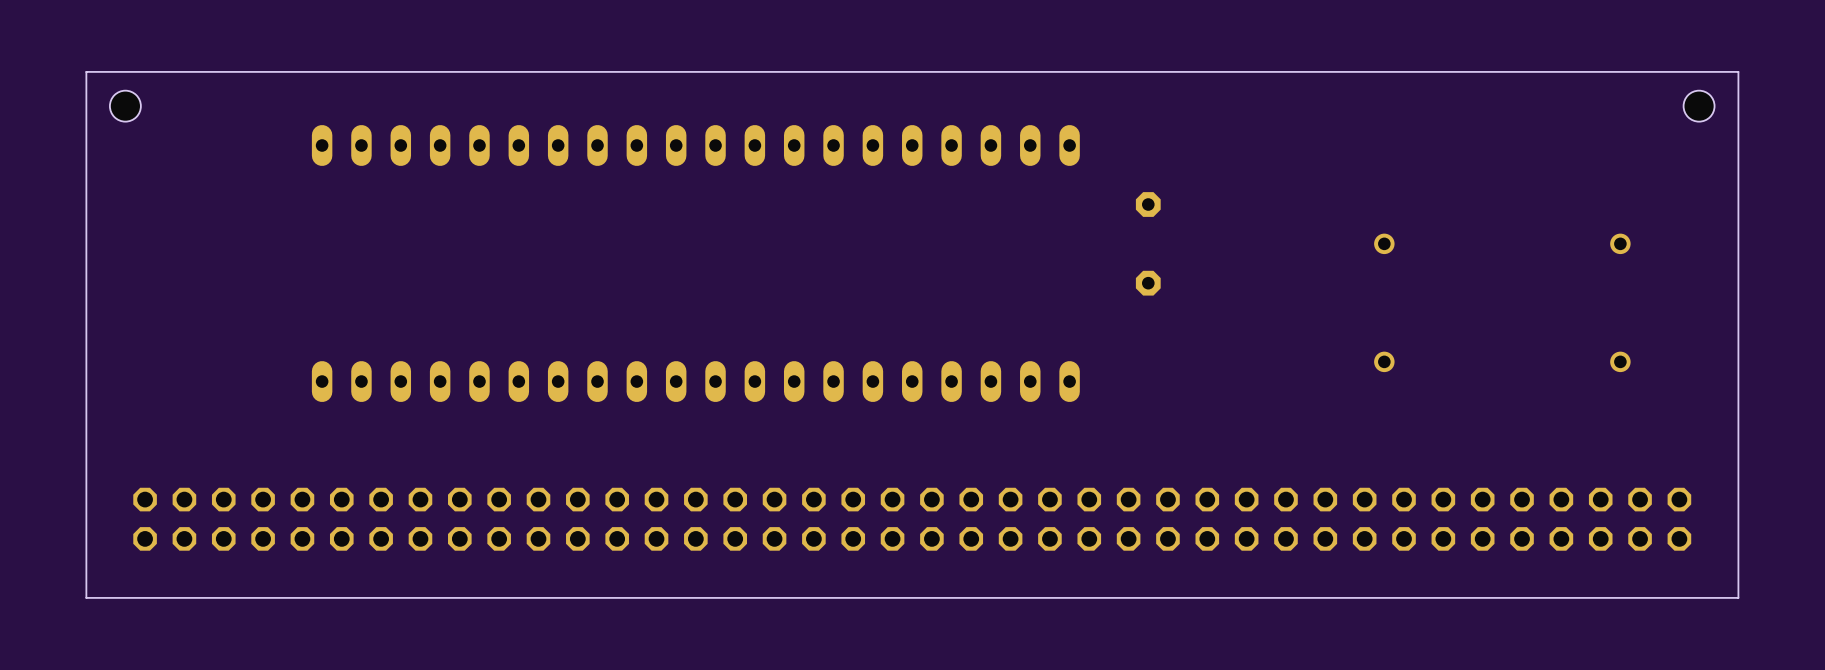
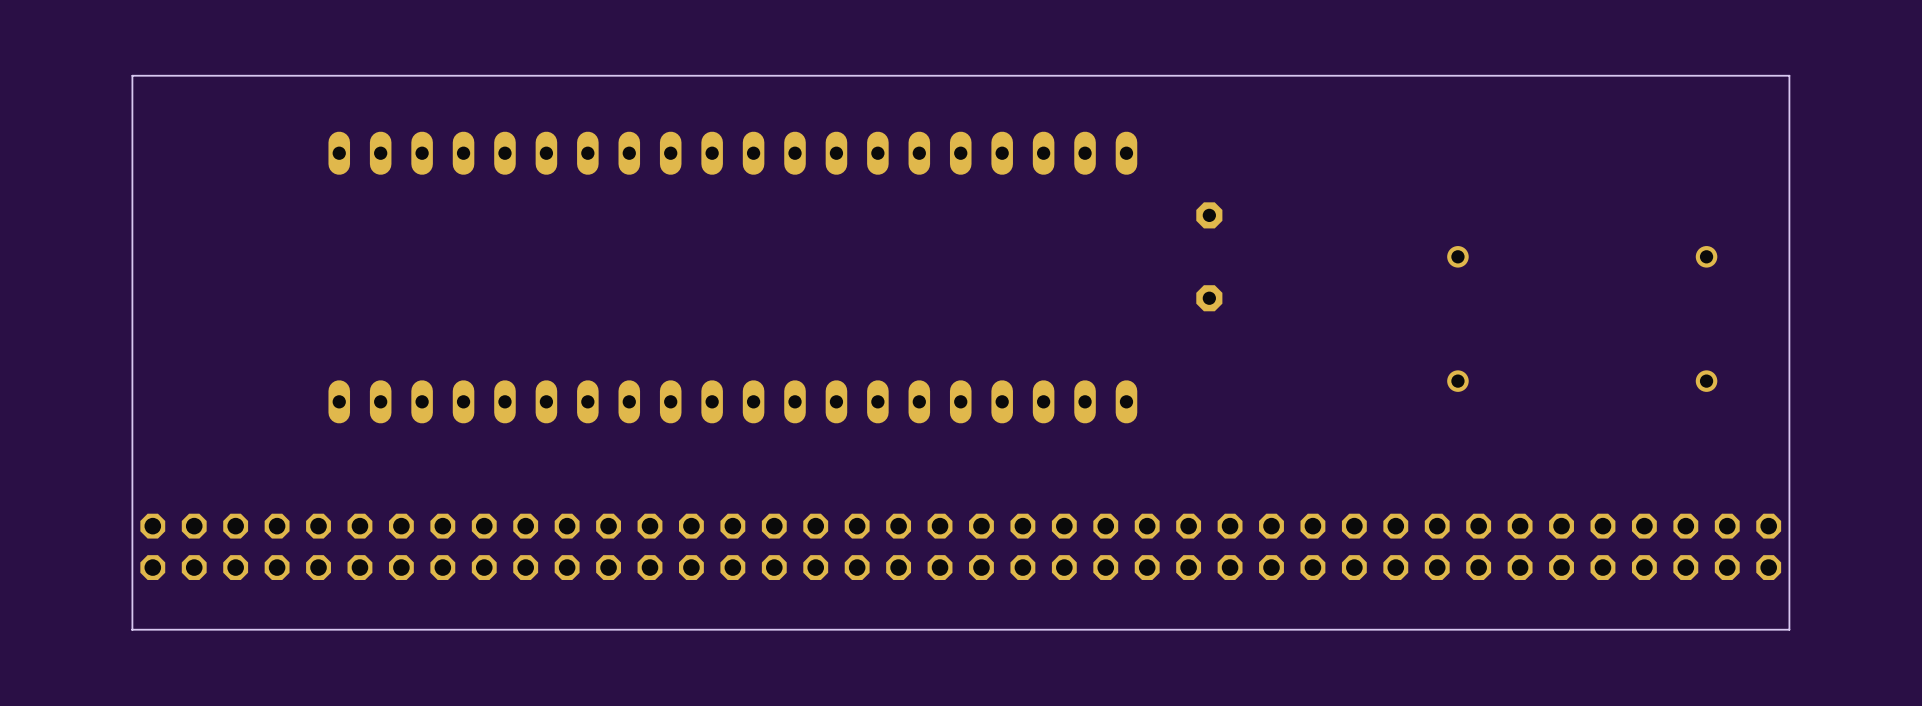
board edge: (125, 71) (86, 71) (86, 597) (125, 597) -> (132, 75) (132, 629)
board edge: (1699, 71) (1738, 71) (1738, 597) (1699, 597) -> (1789, 75) (1789, 629)
hole: (125, 106) -> none
hole: (1699, 106) -> none

